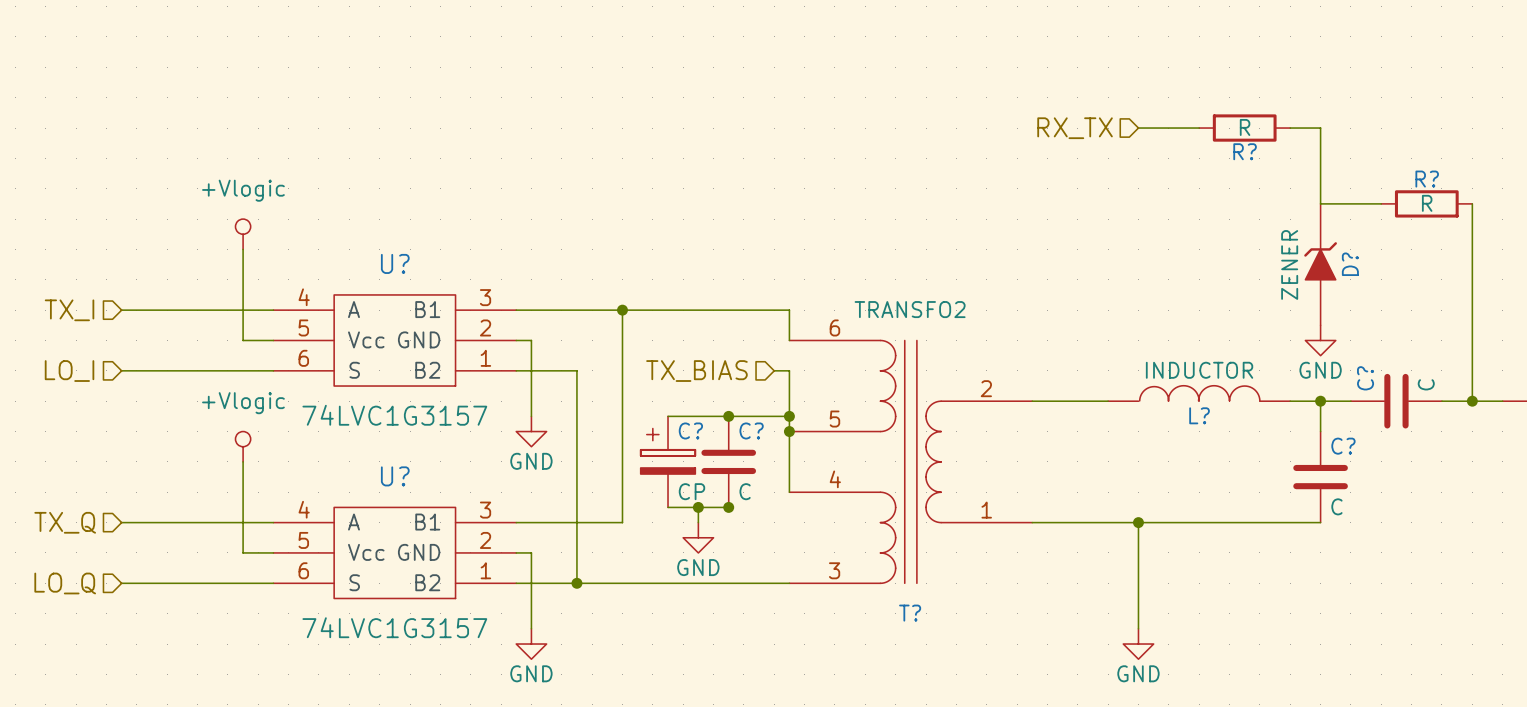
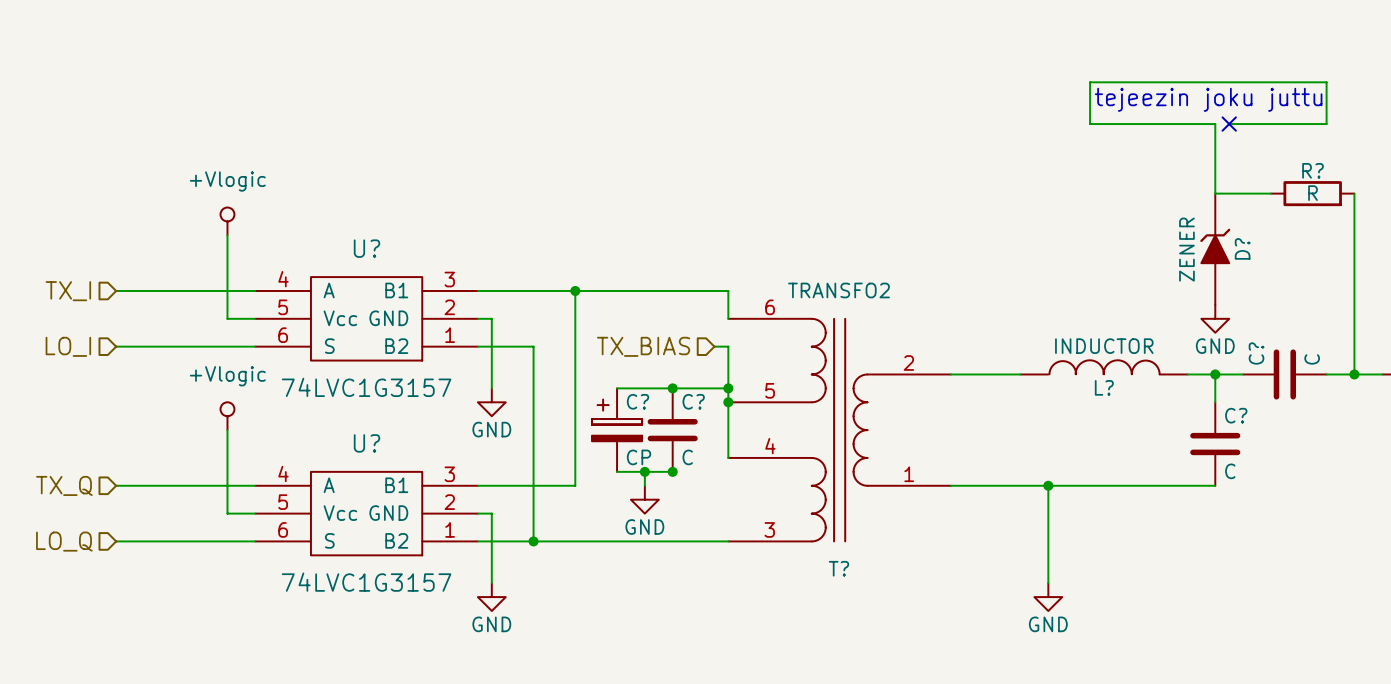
text: none -> tejeezin joku juttu (1208, 99)
hierarchical label: RX_TX (1075, 128) -> none
wire: (1138, 128) (1184, 128) -> (1229, 124) (1326, 124) (1326, 82) (1090, 82) (1090, 124)
wire: none -> (1103, 124) (1187, 124)
R?: R (1244, 128) -> none
no-connect mark: none -> (1229, 124)

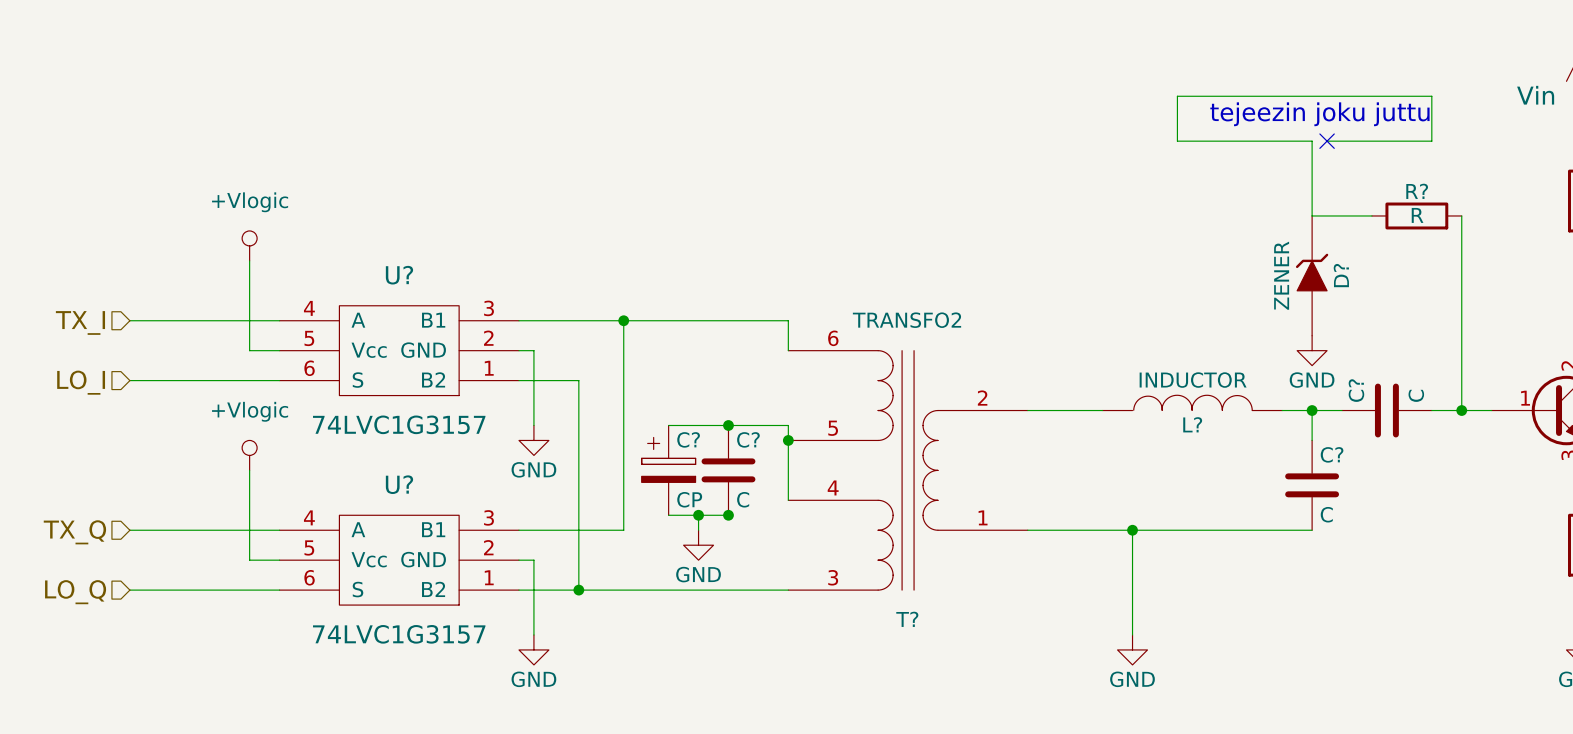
hierarchical label: TX_BIAS (643, 346) -> none
wire: (714, 346) (728, 346) (728, 388) -> none
junction: (728, 388) -> none

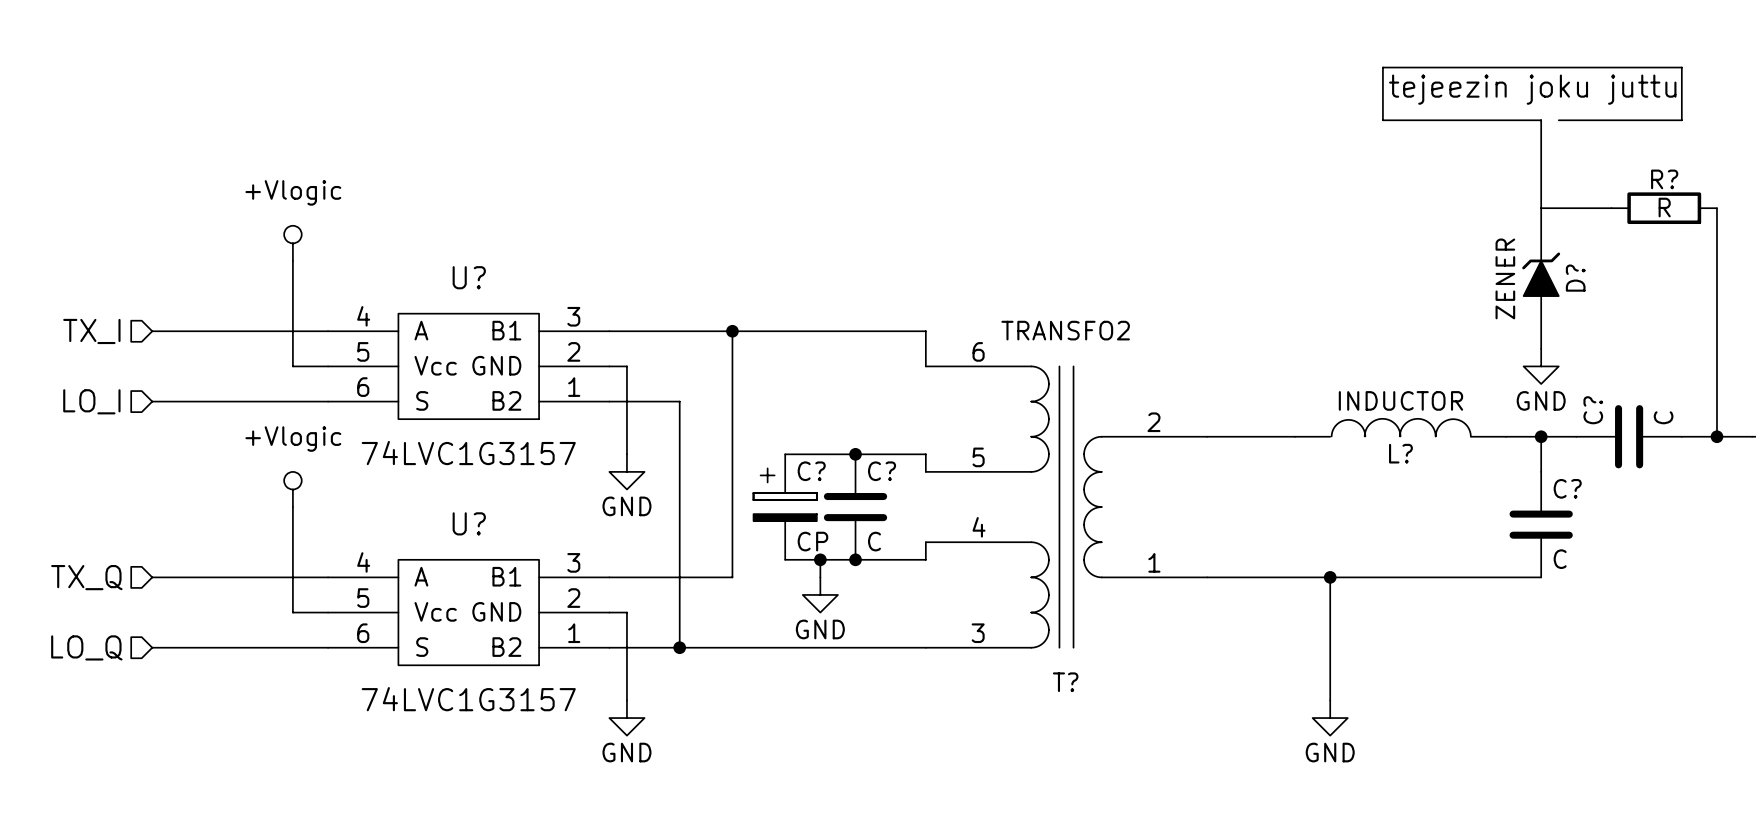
no-connect mark: (1327, 141) -> none
wire: (788, 440) (788, 500) -> (855, 559) (925, 559) (925, 542)
junction: (788, 440) -> none

